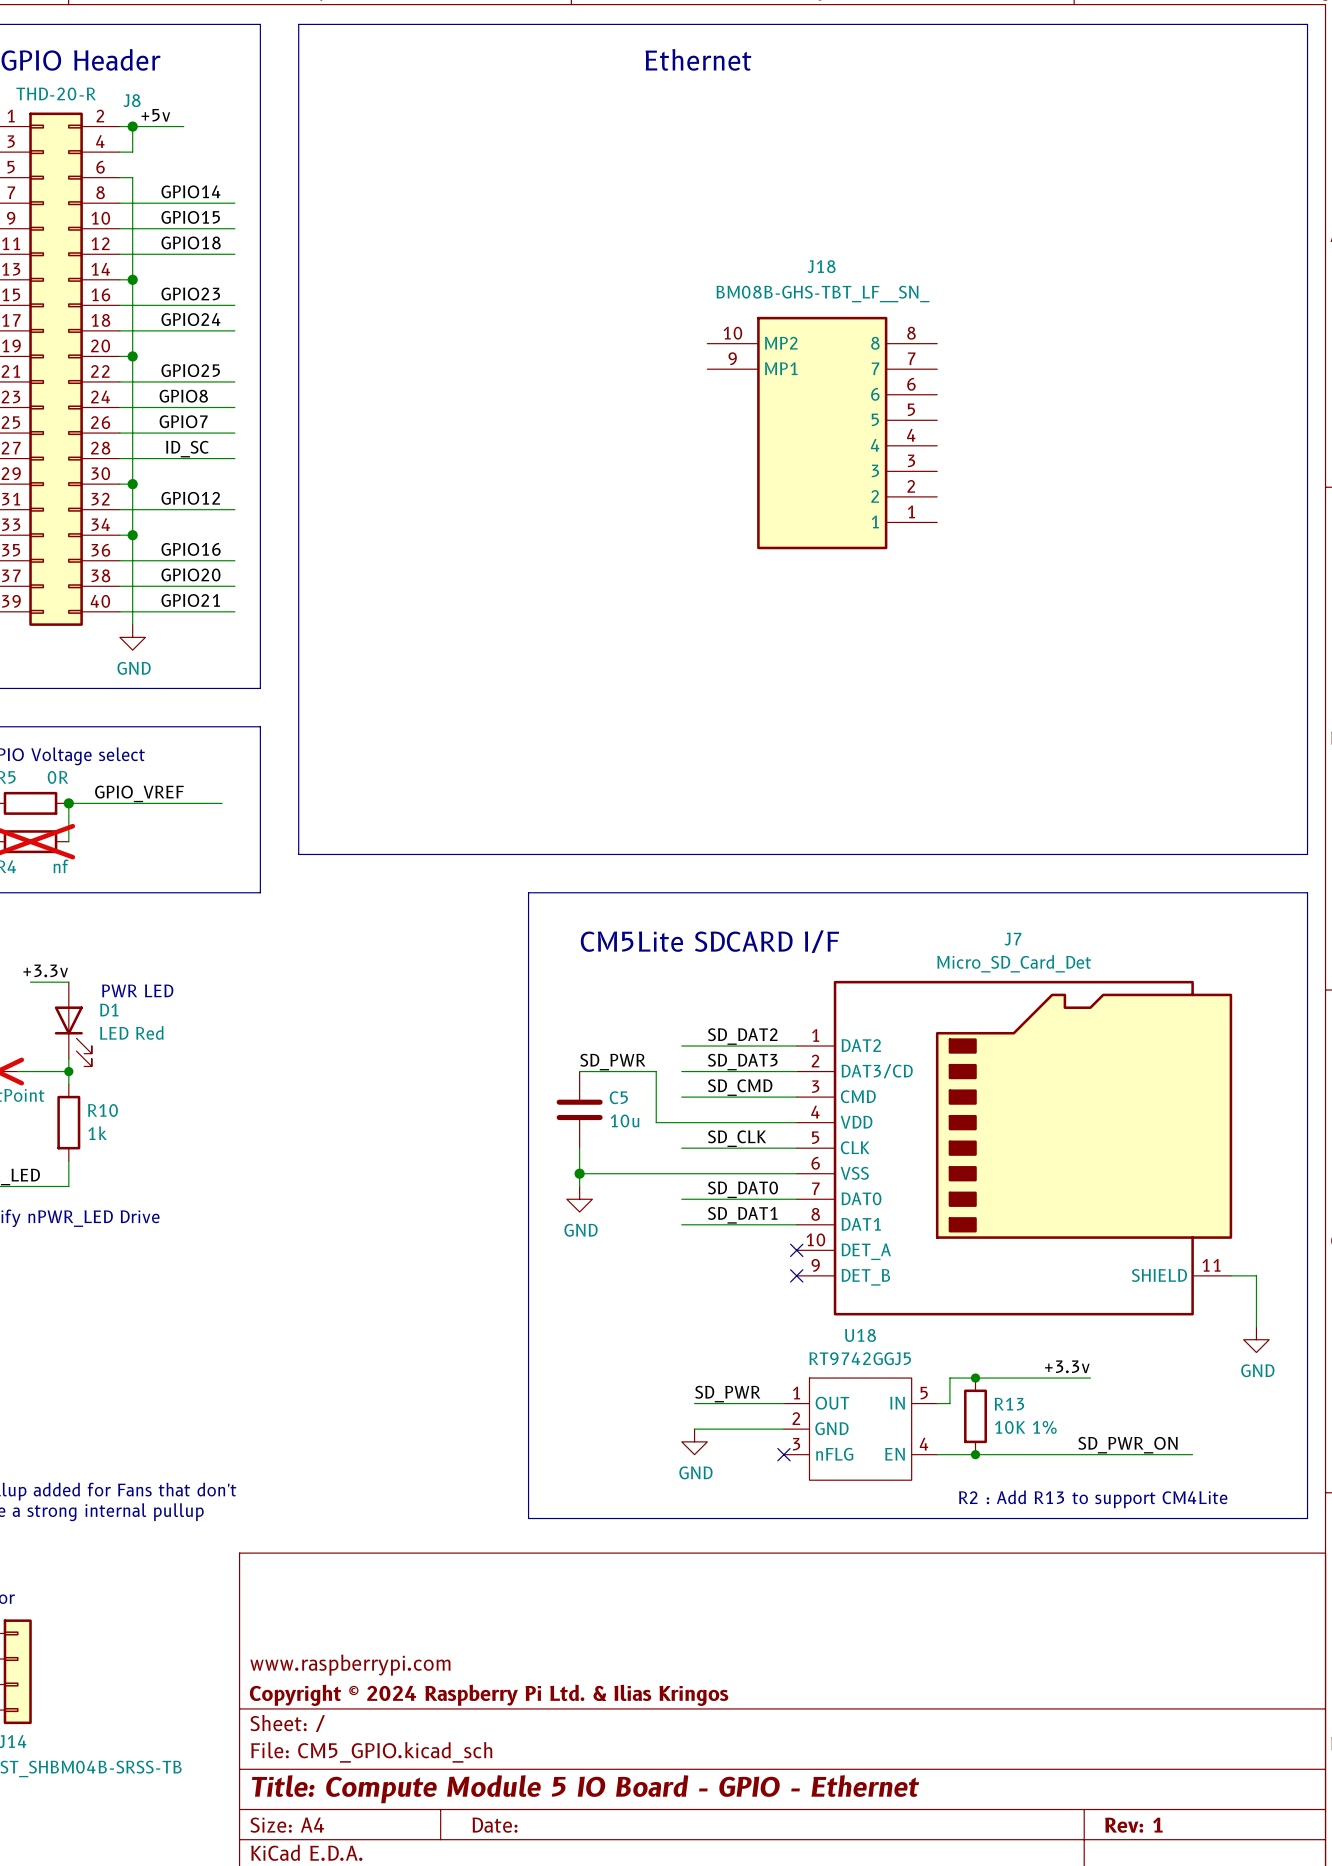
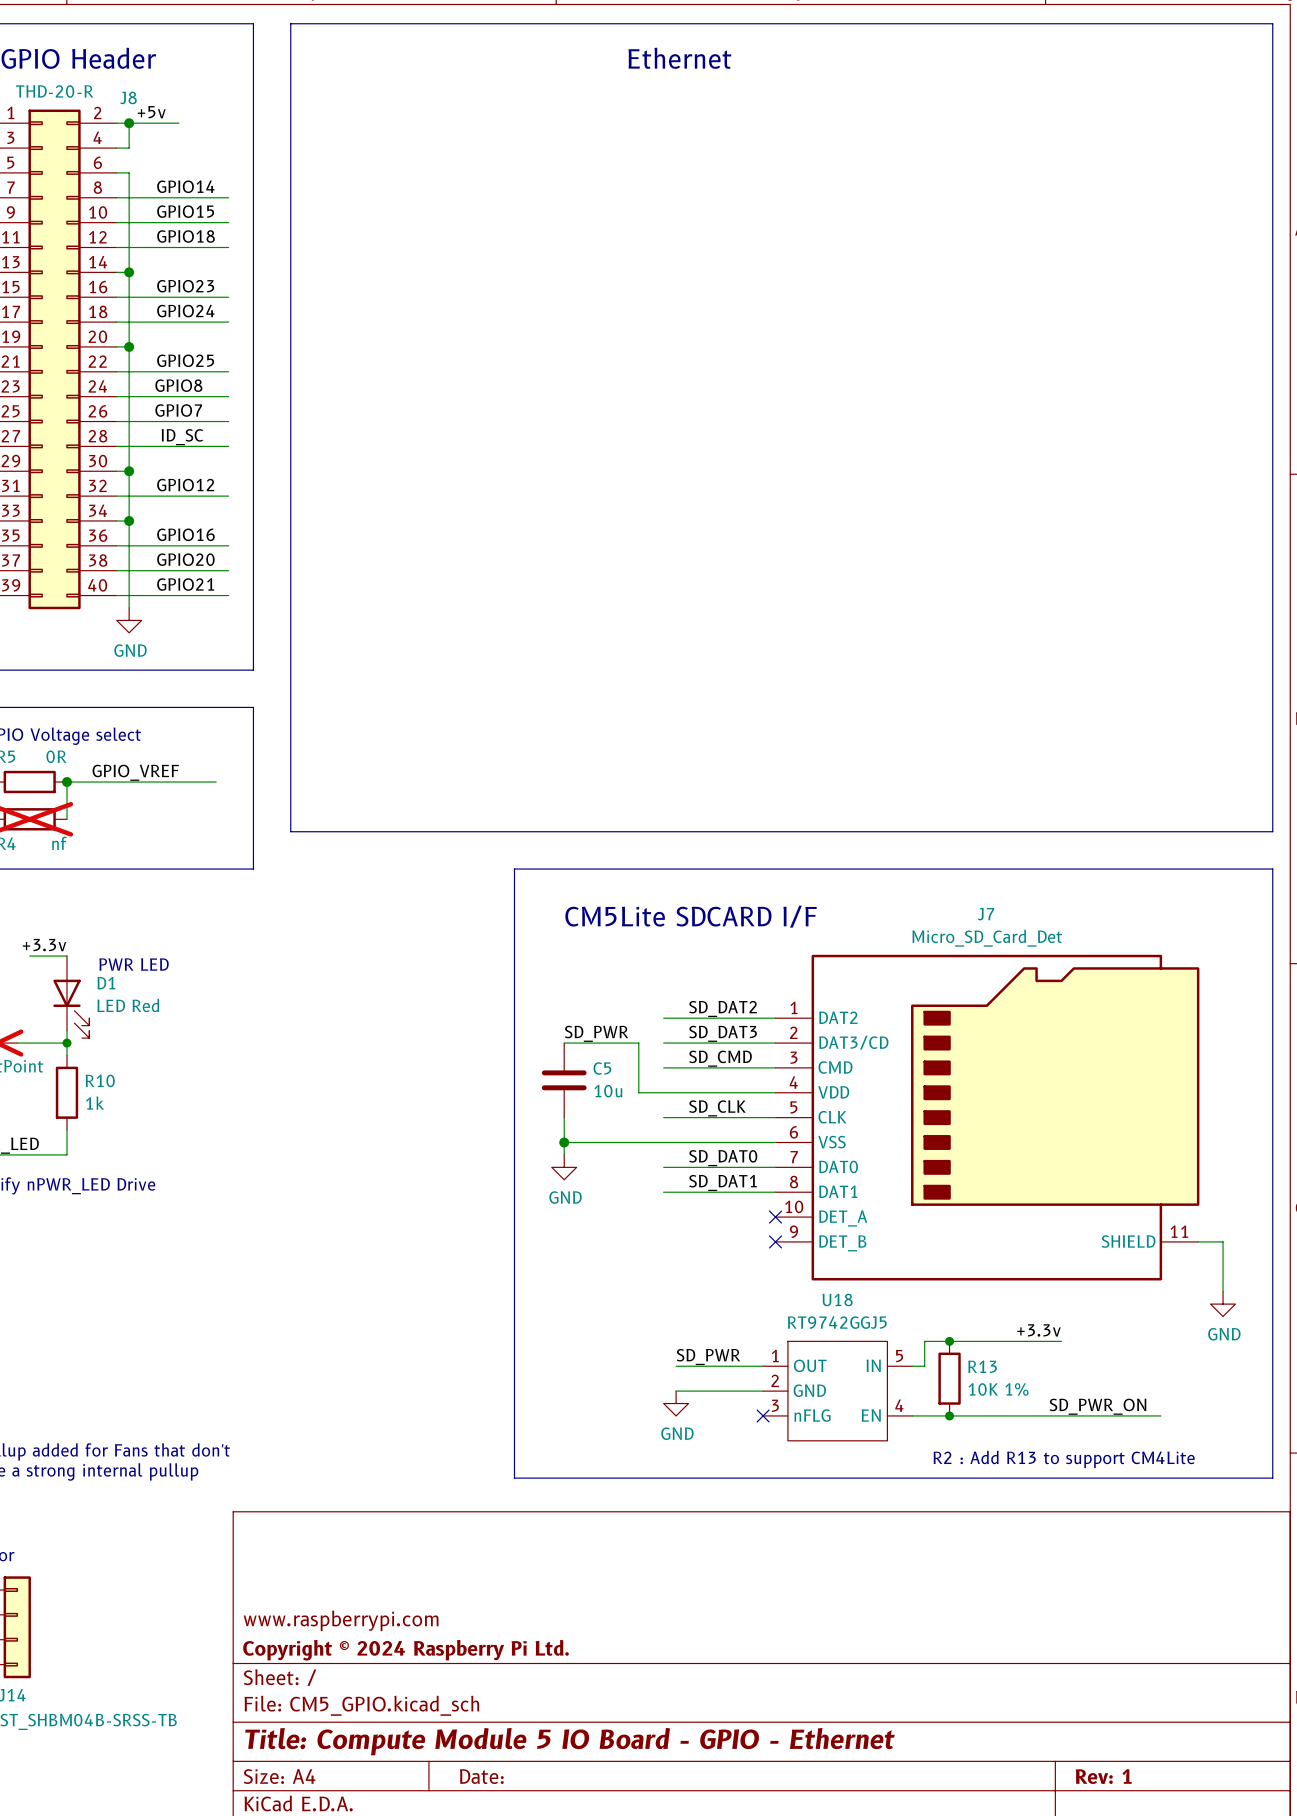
J18: BM08B-GHS-TBT_LF__SN_ (822, 433) -> none
title block: Copyright © 2024 Raspberry Pi Ltd. & Ilias Kringos (489, 1695) -> Copyright © 2024 Raspberry Pi Ltd. (406, 1650)

